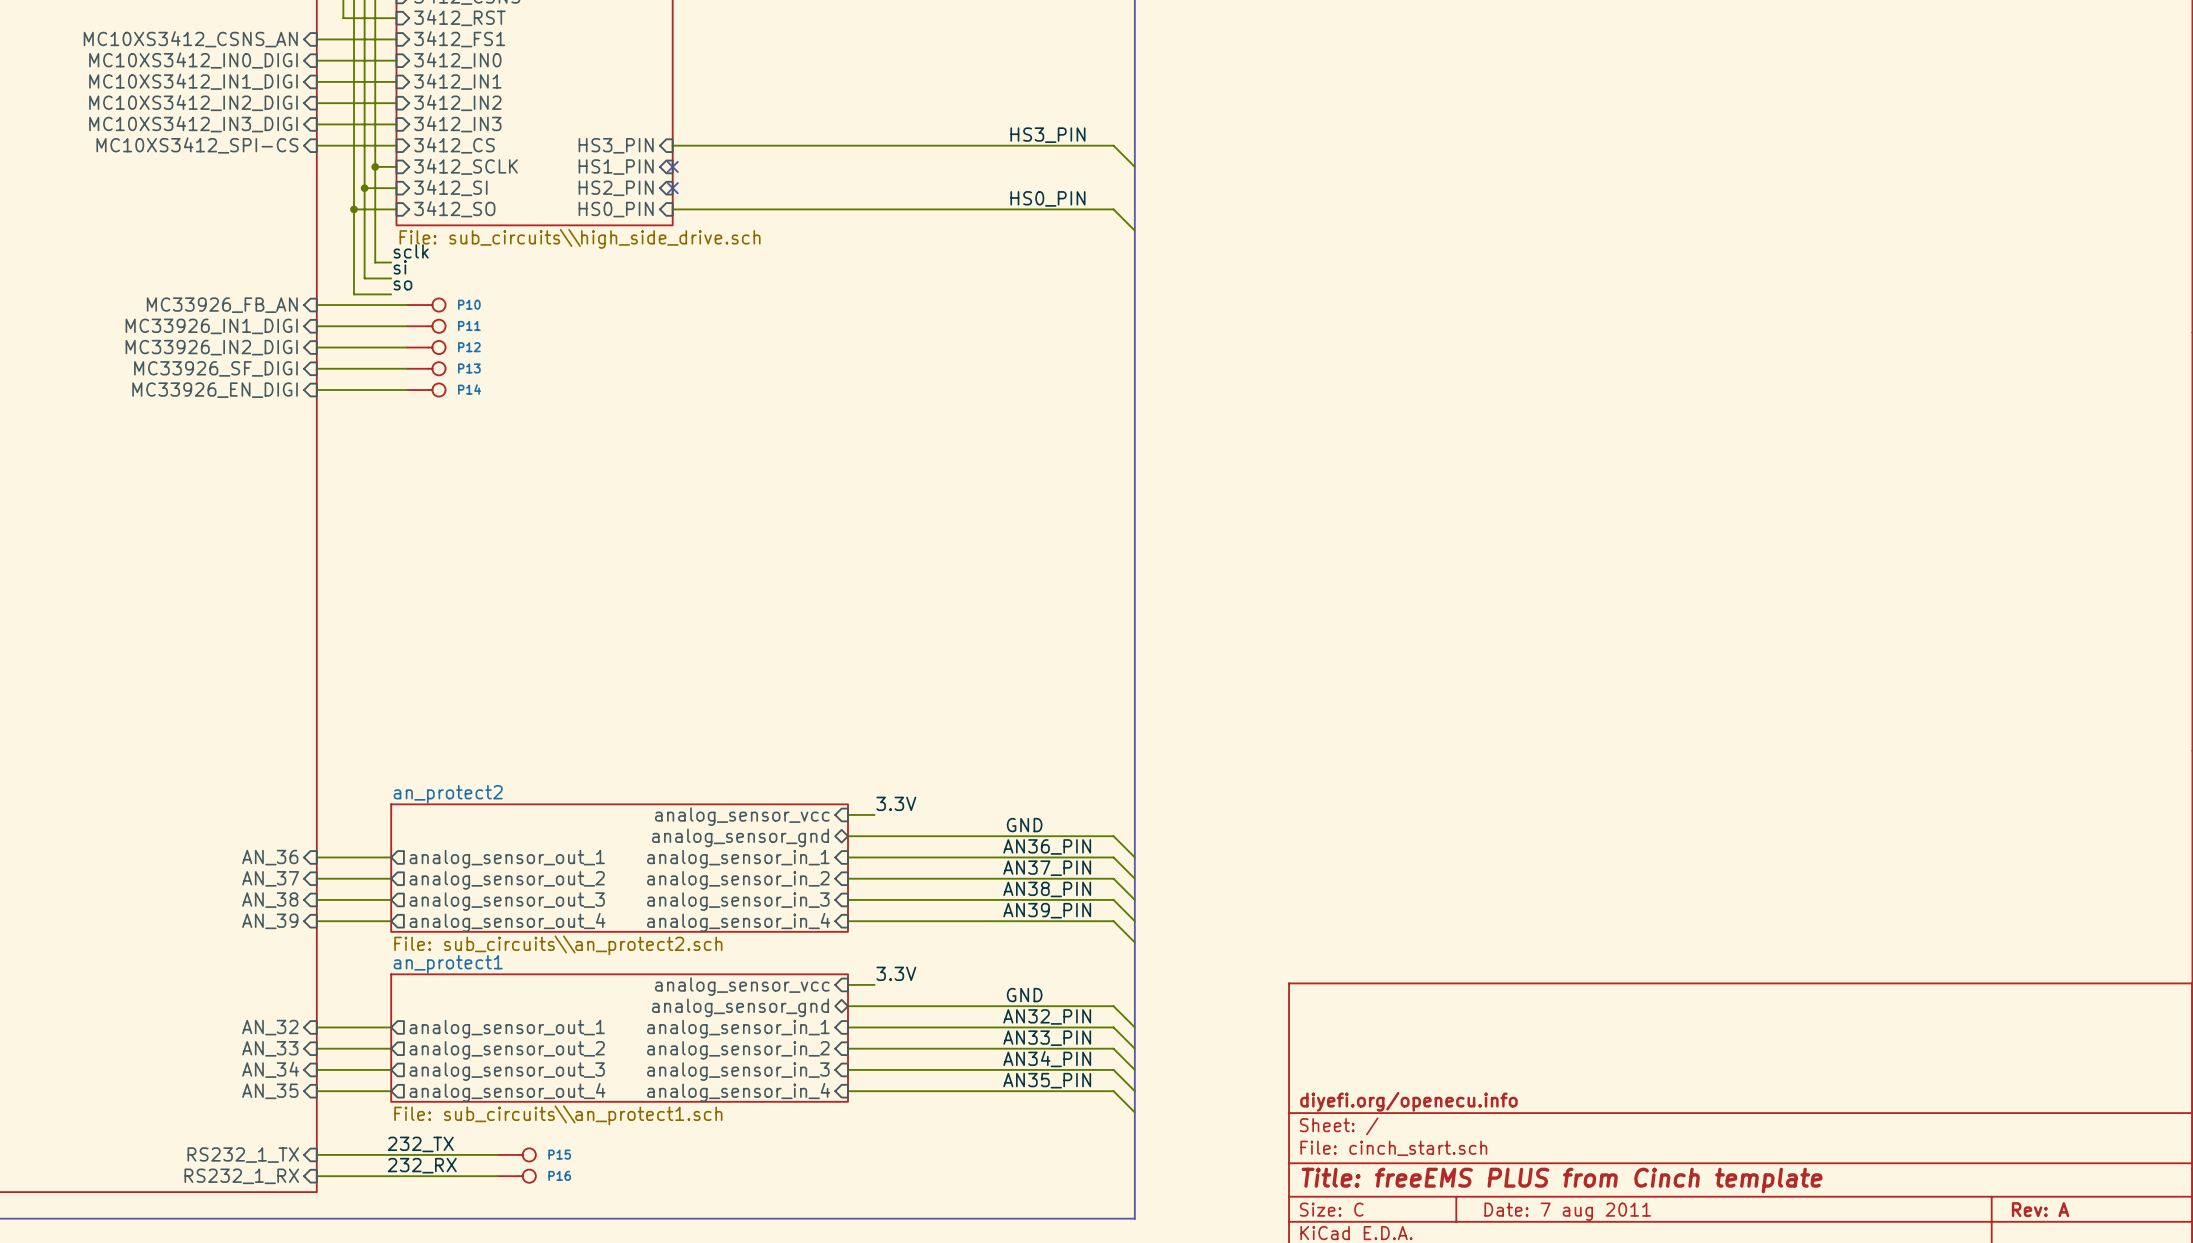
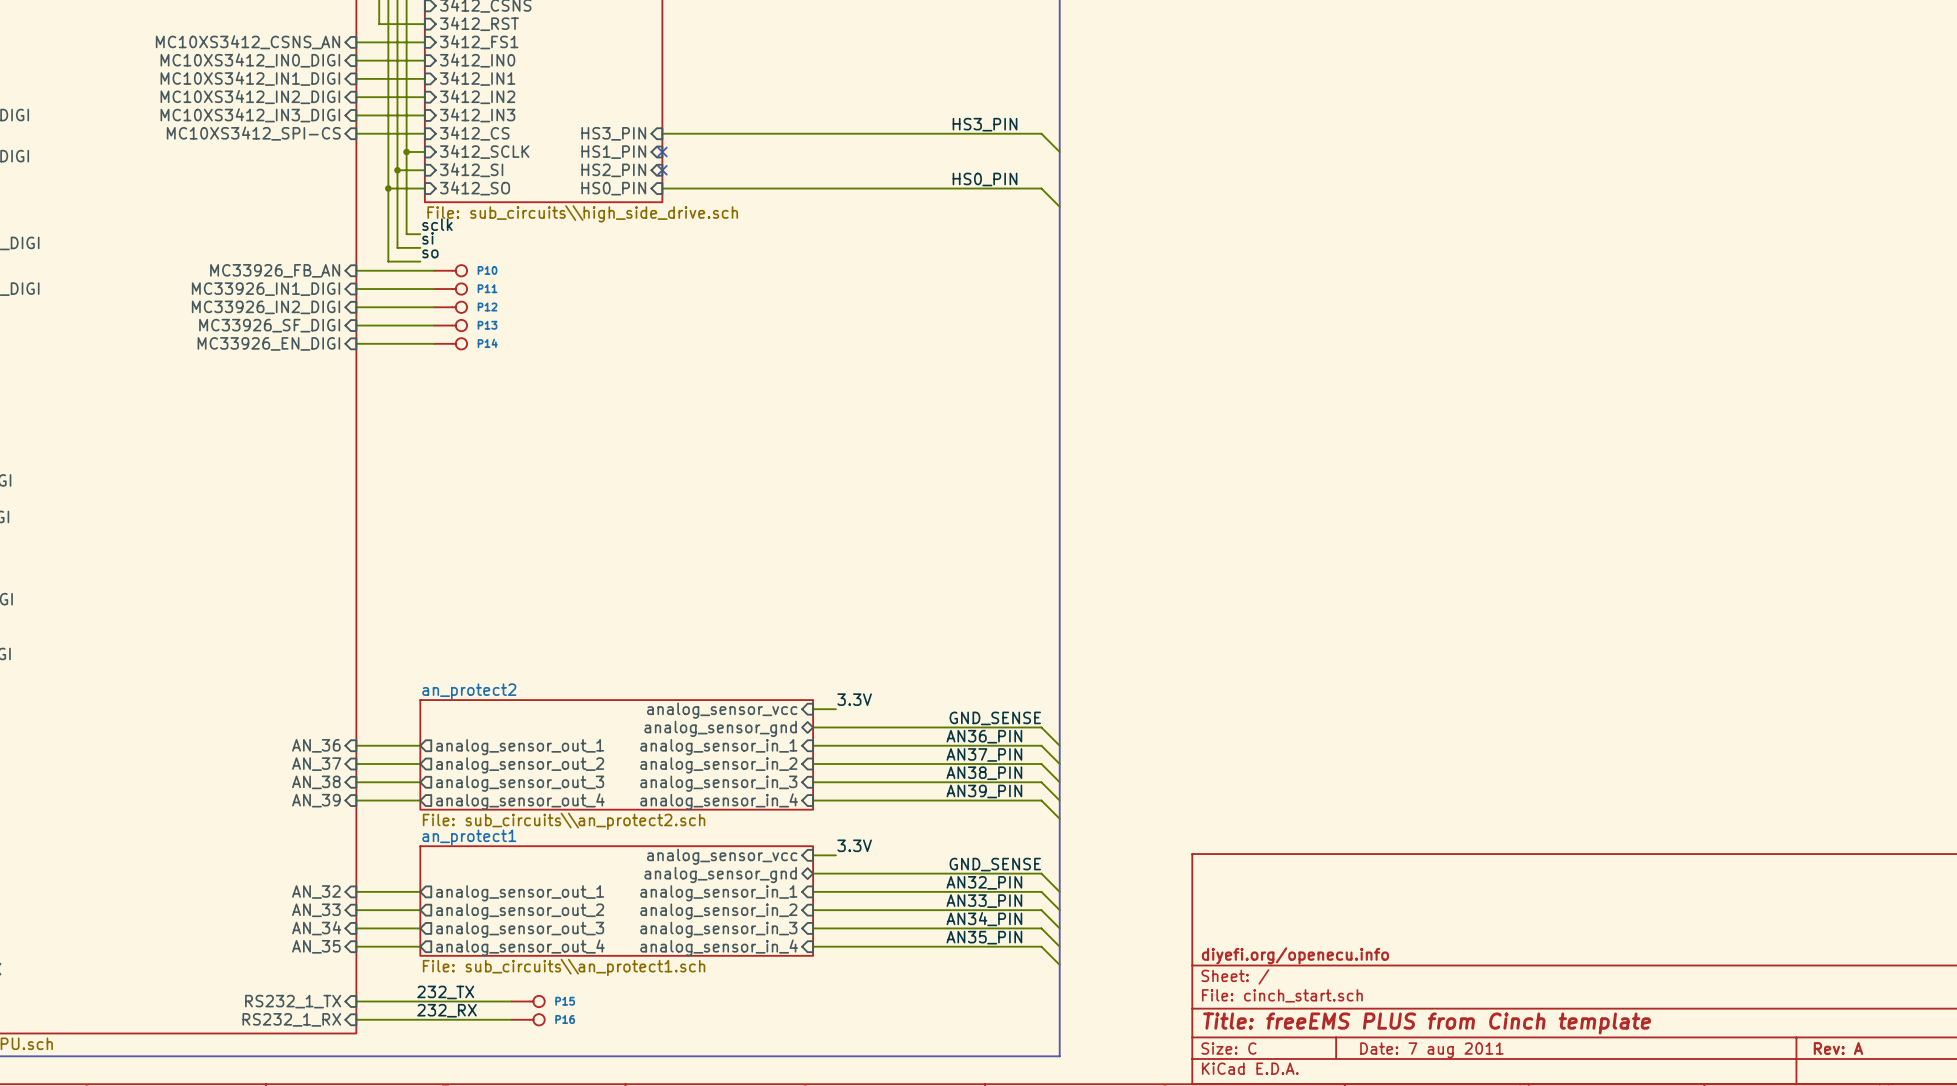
label: GND (1024, 825) -> GND_SENSE (995, 718)
label: GND (1024, 995) -> GND_SENSE (995, 864)

